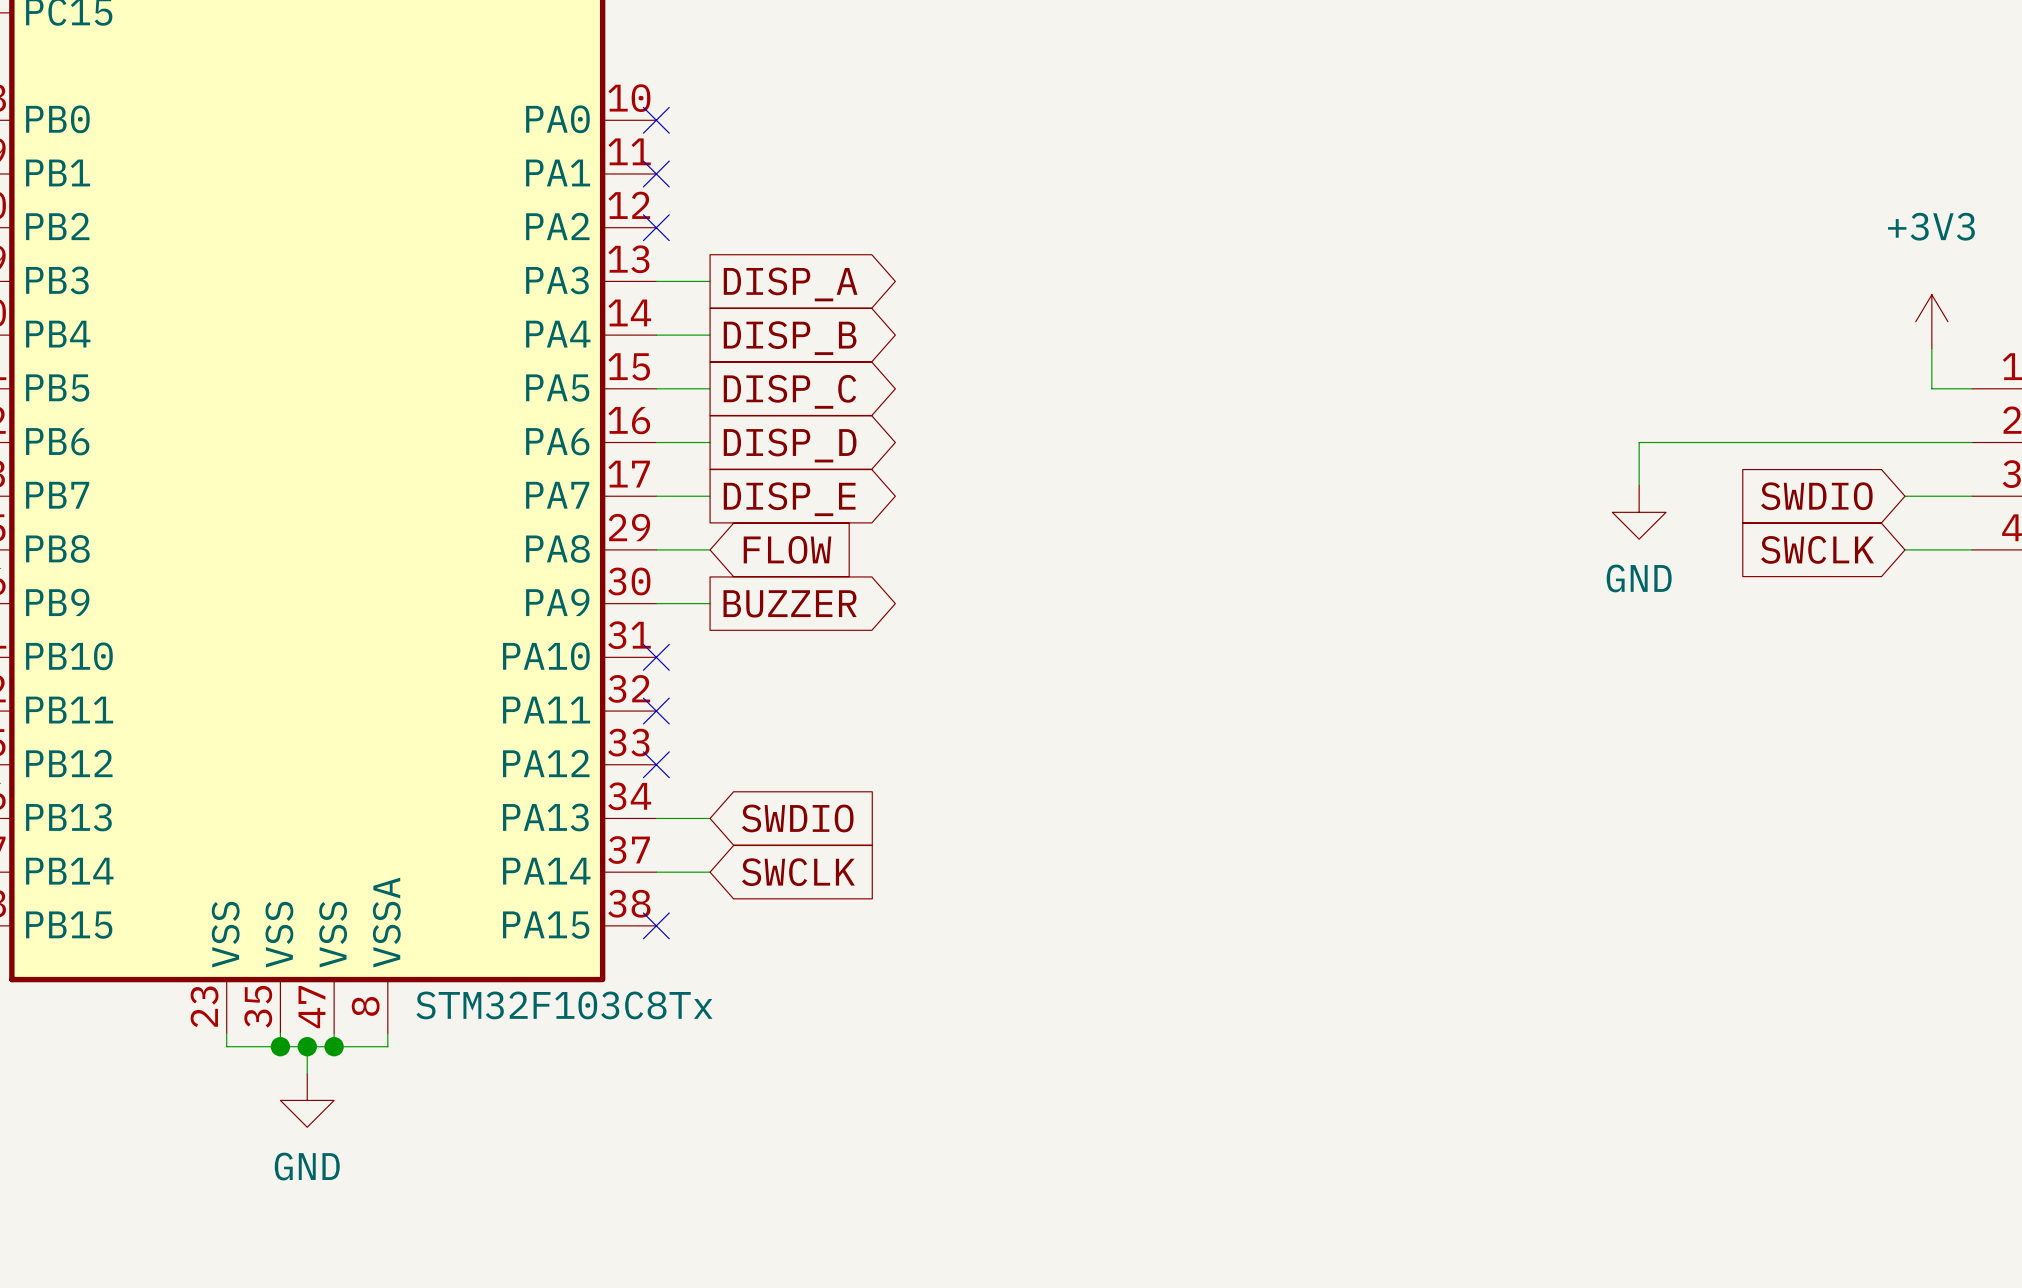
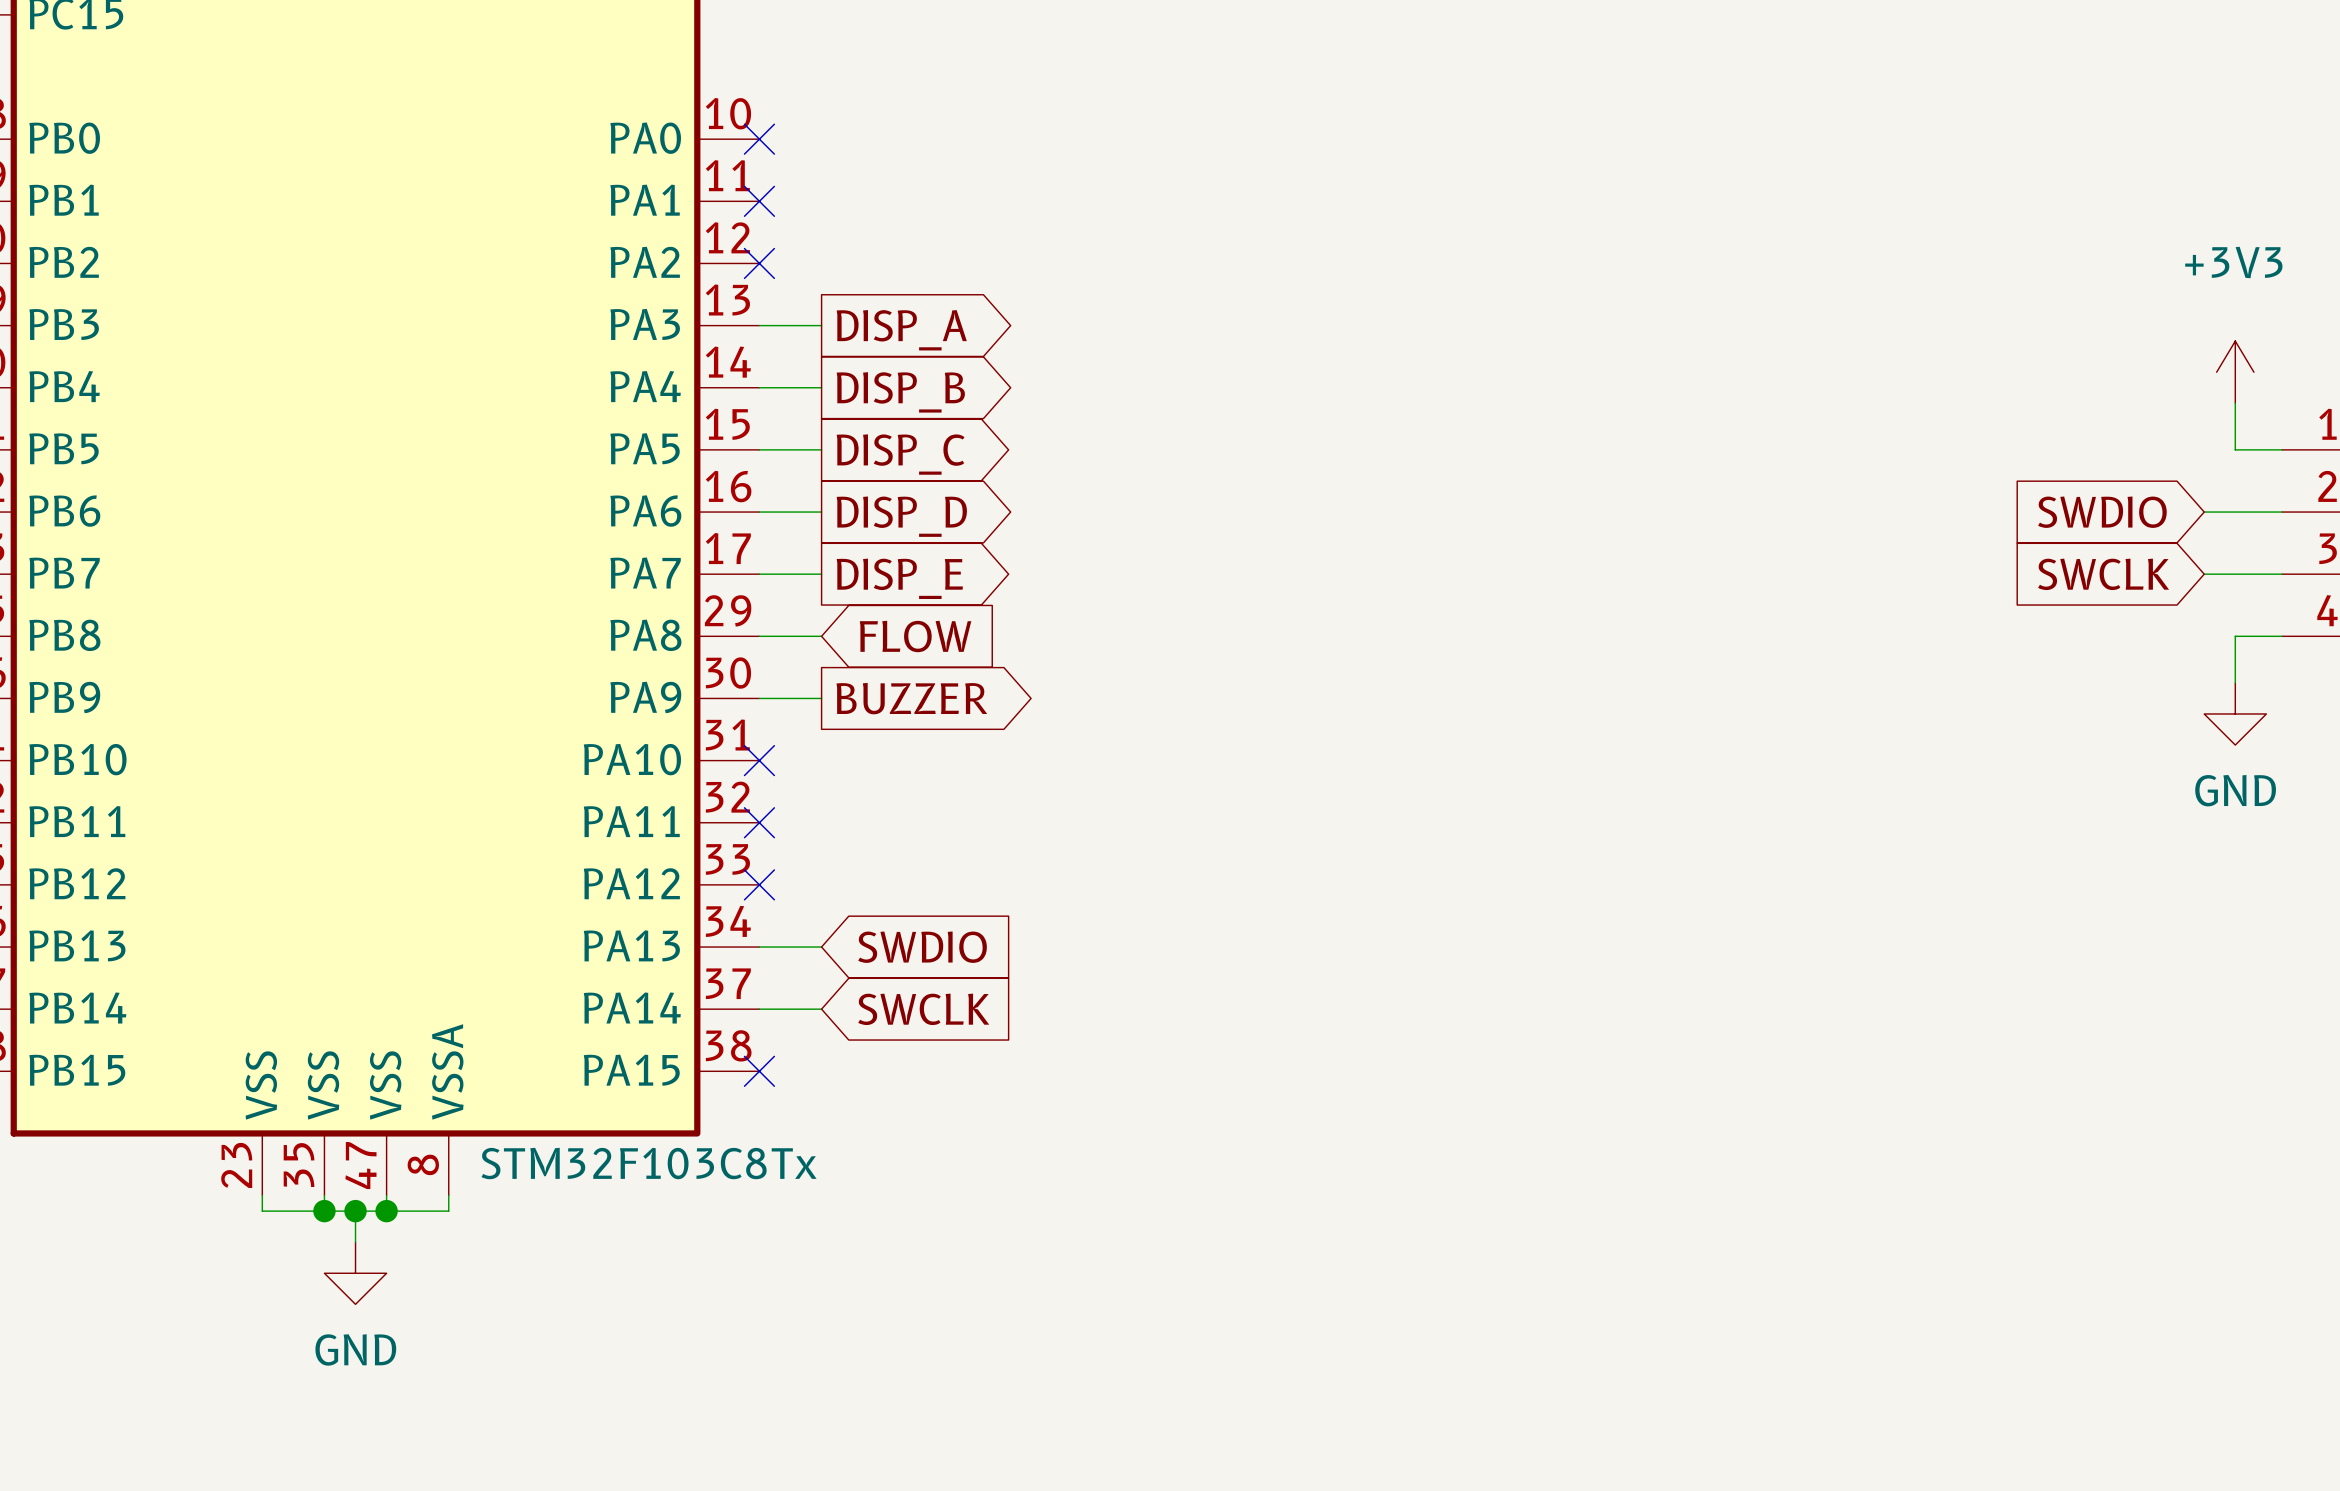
global label: none -> SWDIO (2102, 512)
wire: (1905, 442) (1639, 442) (1639, 485) -> none
global label: SWDIO (1816, 496) -> SWCLK (2103, 574)
power symbol position: GND (1639, 512) -> GND (2235, 713)
global label: SWCLK (1817, 549) -> none
wire: (1905, 549) (1931, 549) -> (2235, 682) (2235, 636)

